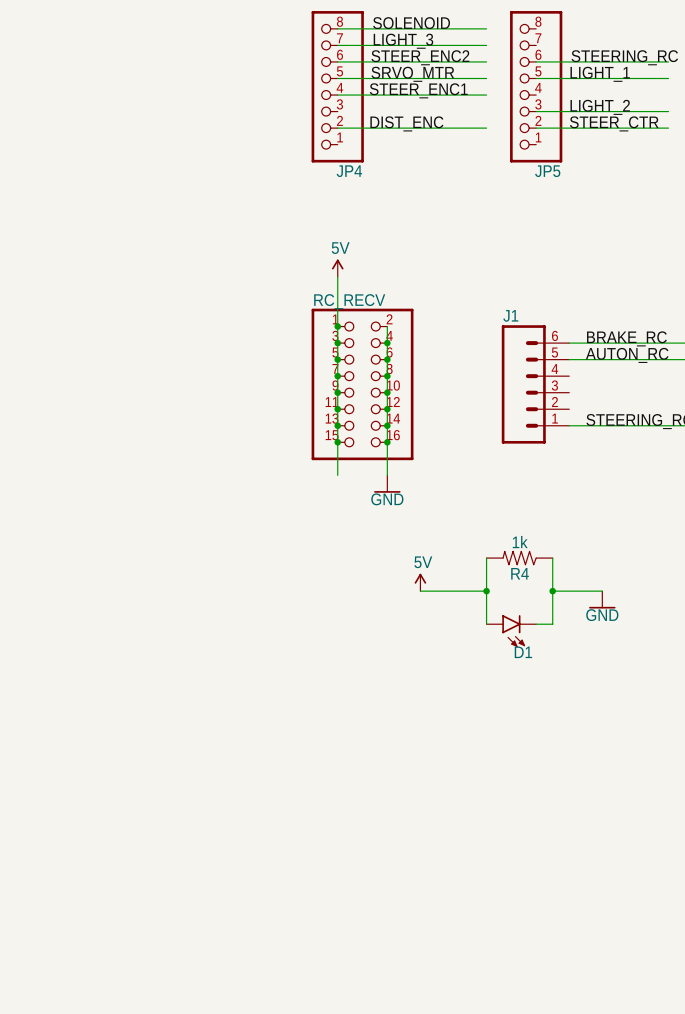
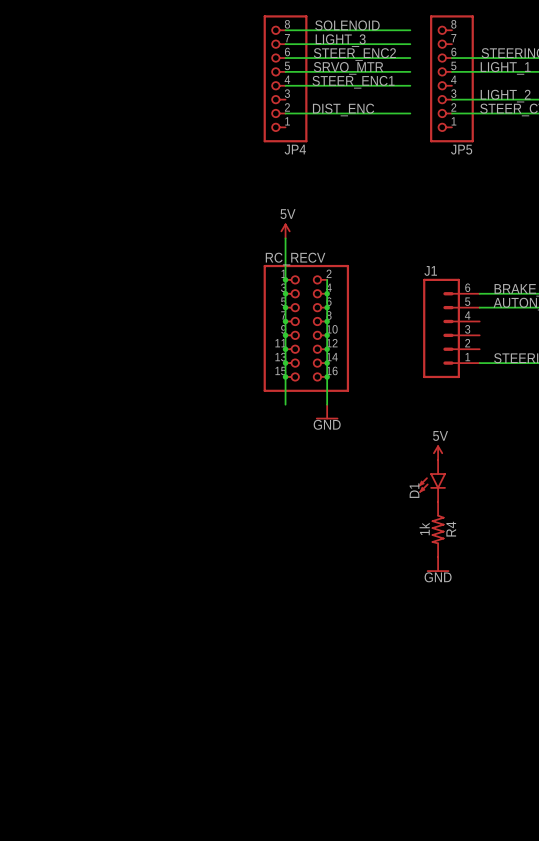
wire: (486, 558) (486, 624) -> none
R4 rotation: 0° (519, 558) -> 90° counterclockwise (438, 529)
R4 position: (519, 558) -> (438, 529)
wire: (552, 558) (552, 624) (536, 624) -> none
power symbol position: 5V (420, 582) -> 5V (438, 452)
wire: (420, 591) (486, 591) -> none
junction: (486, 591) -> none
wire: (552, 591) (602, 591) -> none
junction: (552, 591) -> none
power symbol position: GND (602, 599) -> GND (438, 564)
D1 position: (511, 631) -> (432, 480)
D1 rotation: 0° (513, 631) -> 90° clockwise (432, 482)

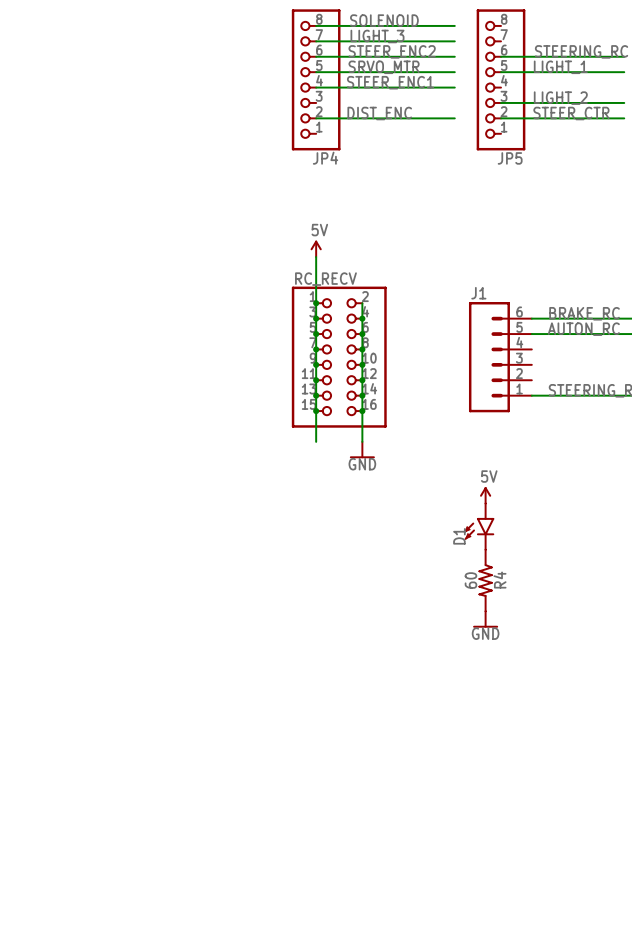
R4 value: 1k (424, 529) -> 60 (470, 580)

